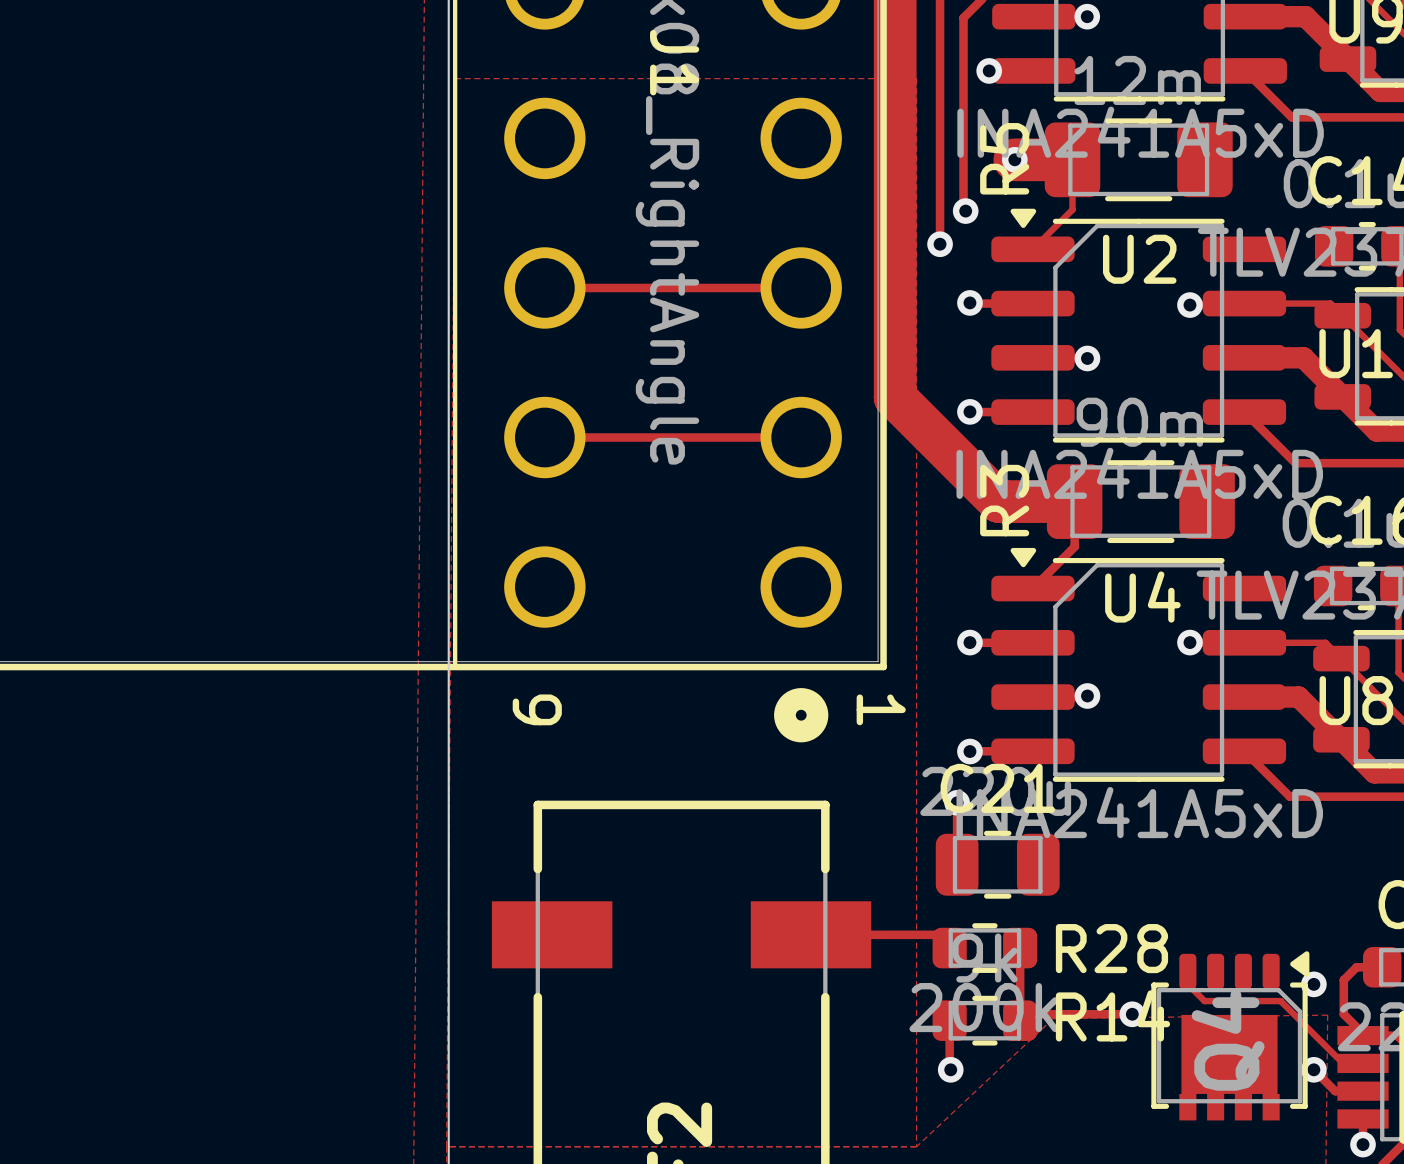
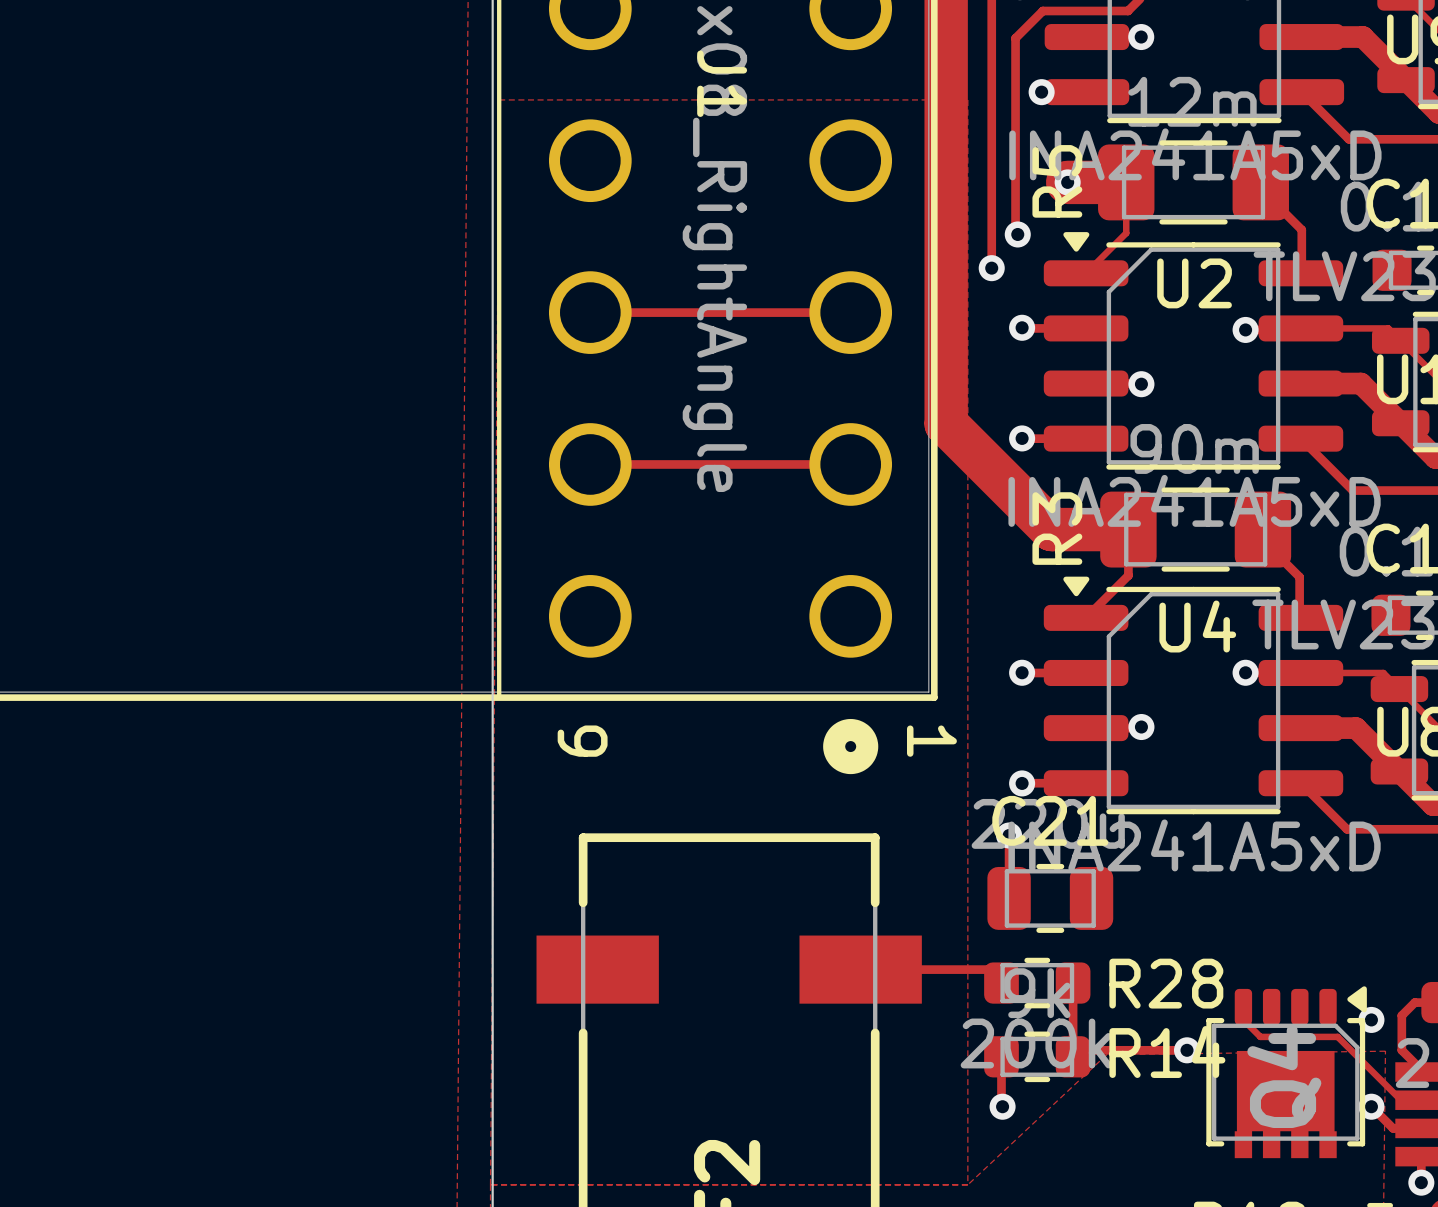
track: none -> (1260, 188) (1301, 229) (1301, 269)
track: none -> (1258, 535) (1299, 577) (1299, 616)

